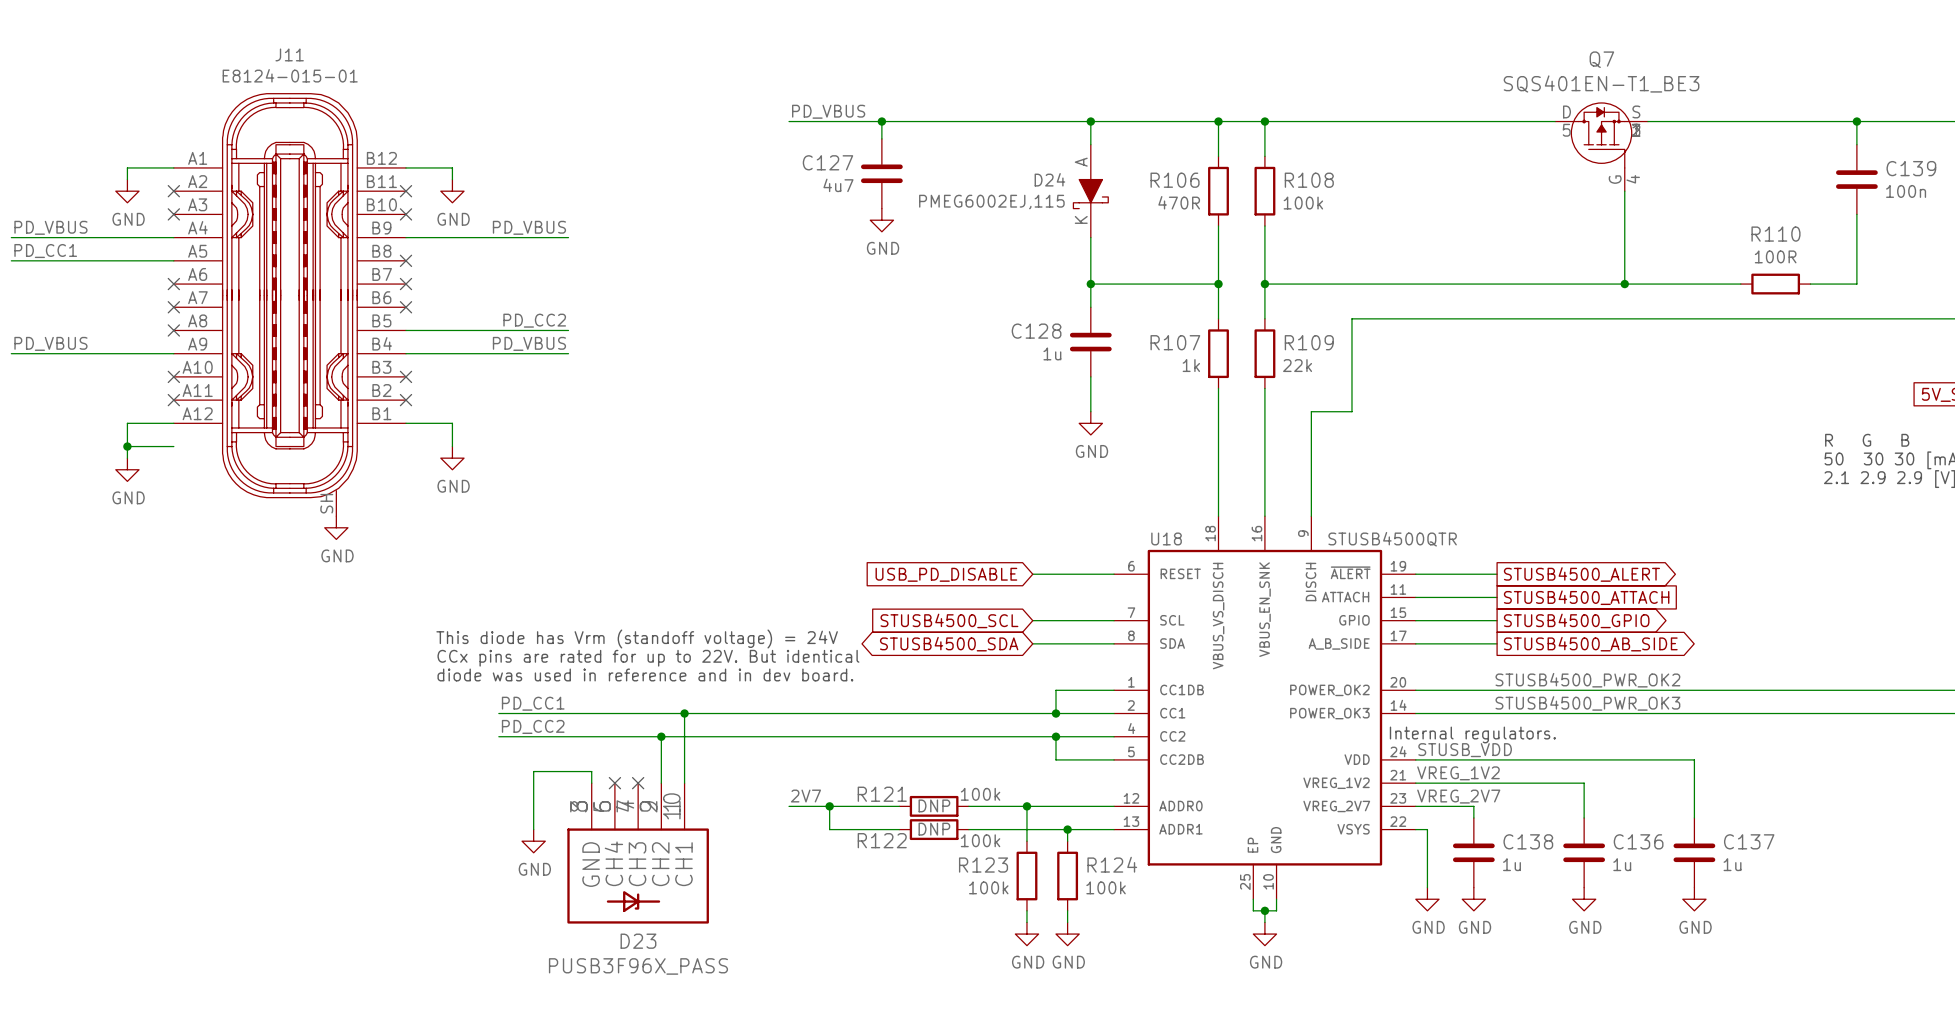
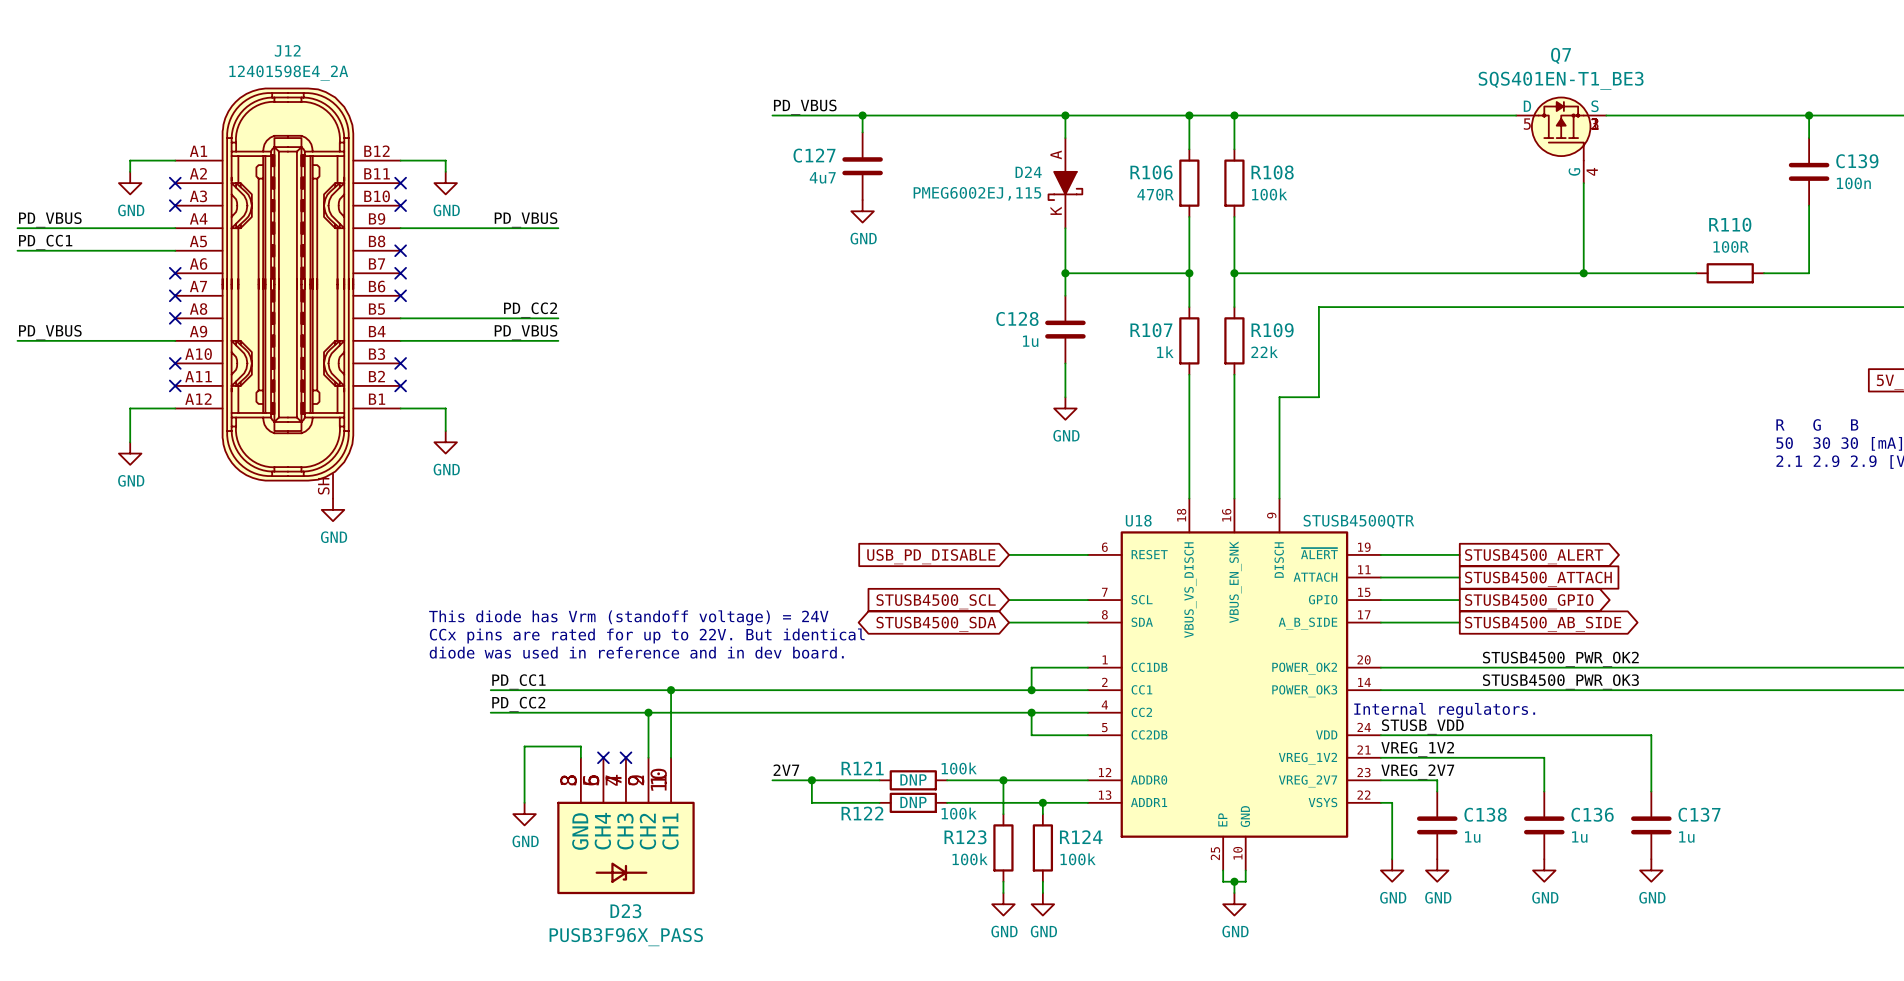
J11 name: J11 (289, 54) -> J12 (287, 50)
J11 value: E8124-015-01 (290, 75) -> 12401598E4_2A (288, 73)
wire: (127, 446) (173, 446) -> none
junction: (127, 446) -> none

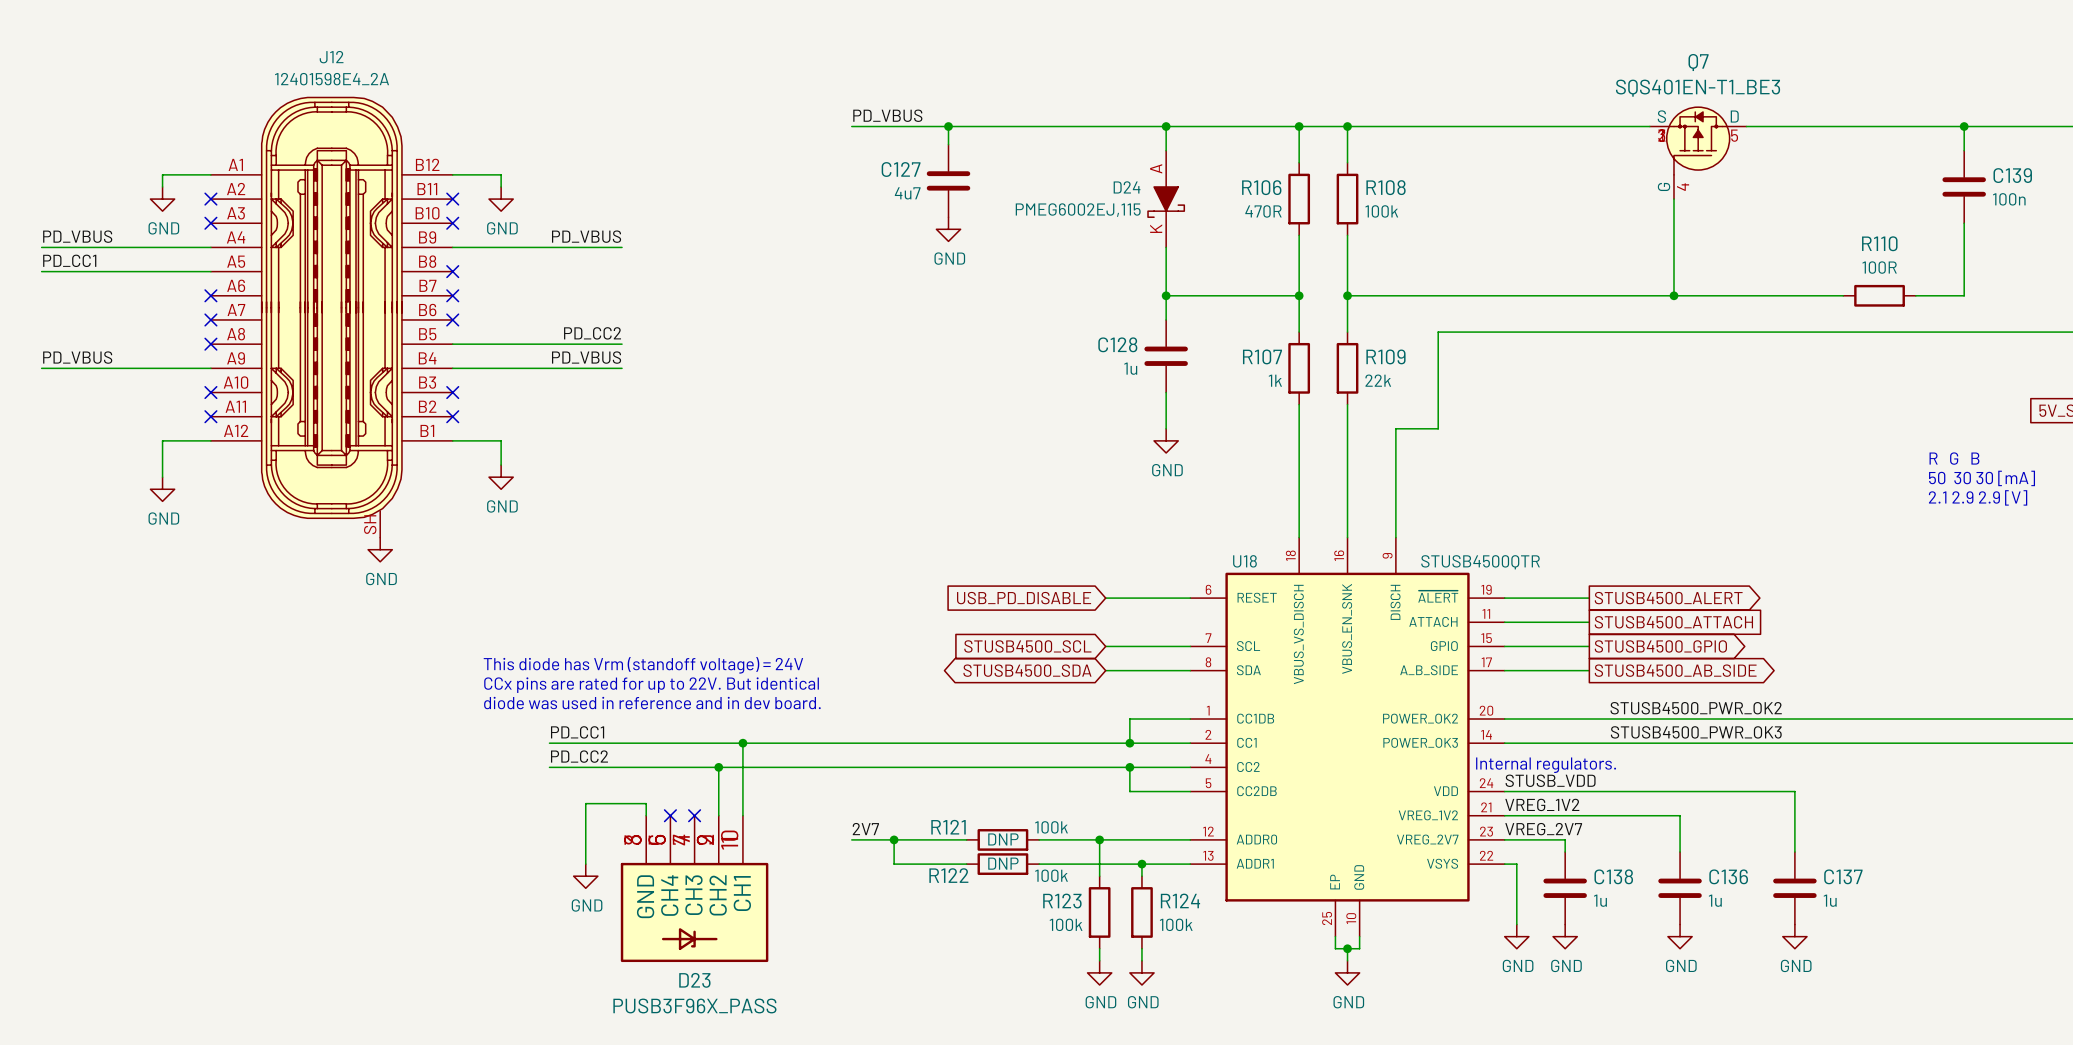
Q7 flip: as is (1561, 129) -> left-right (1698, 141)
wire: (1583, 183) (1583, 273) -> (1673, 199) (1673, 295)
junction position: (1583, 273) -> (1673, 295)

